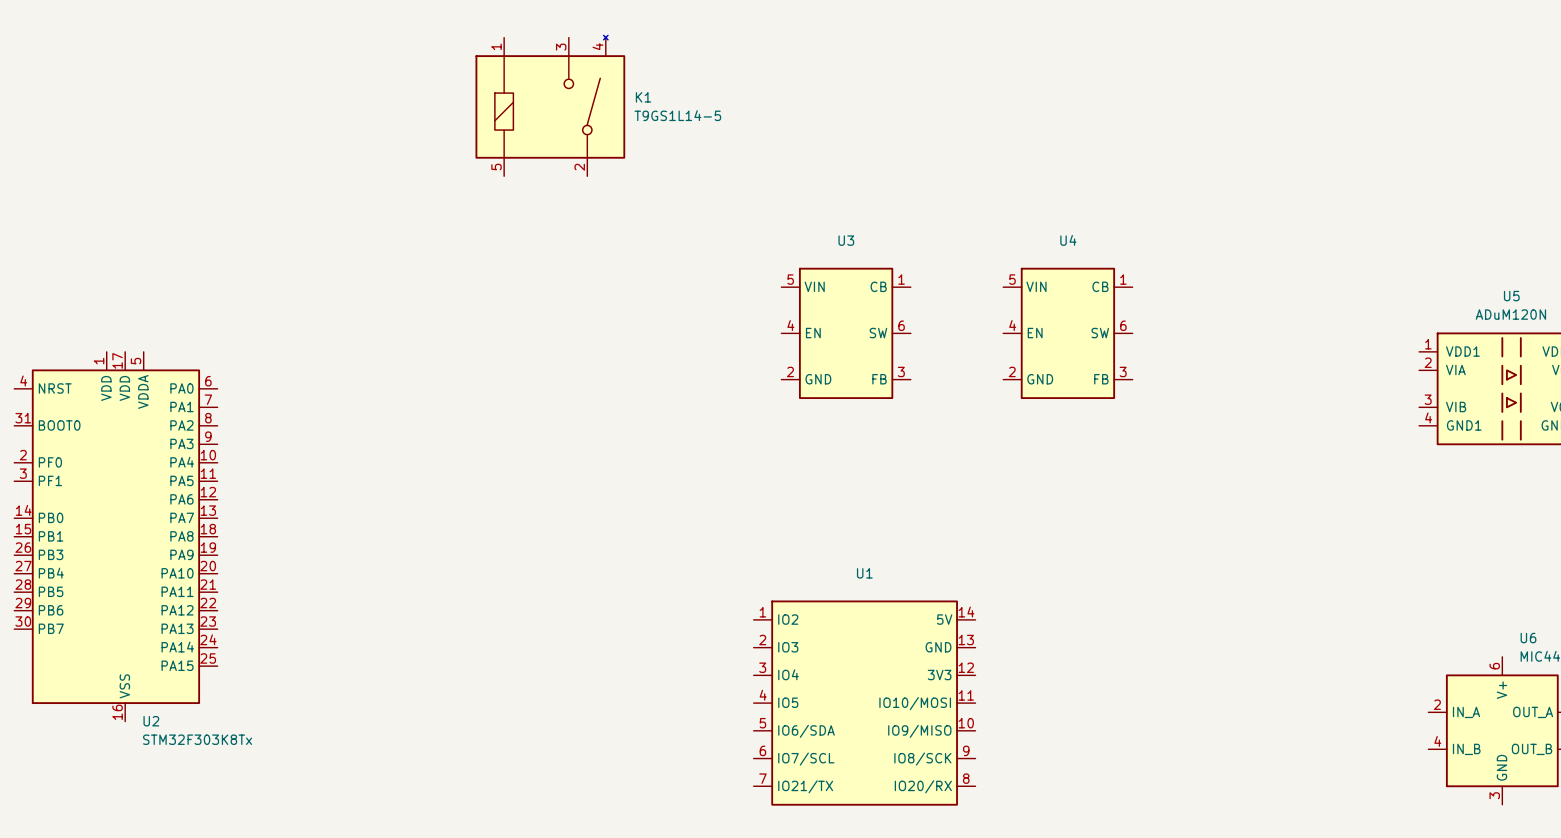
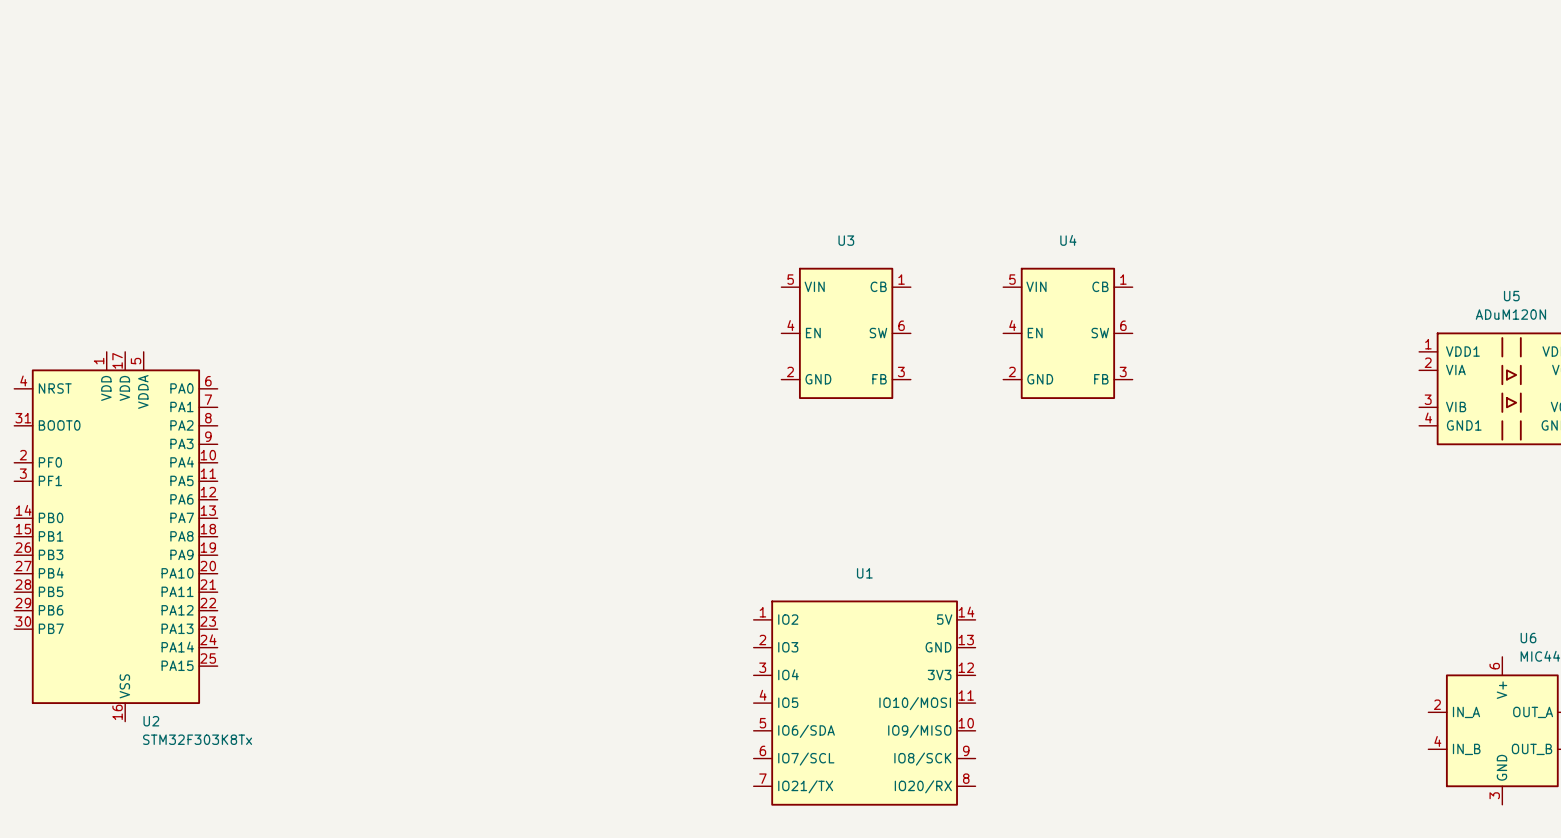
K1: T9GS1L14-5 (550, 105) -> none

